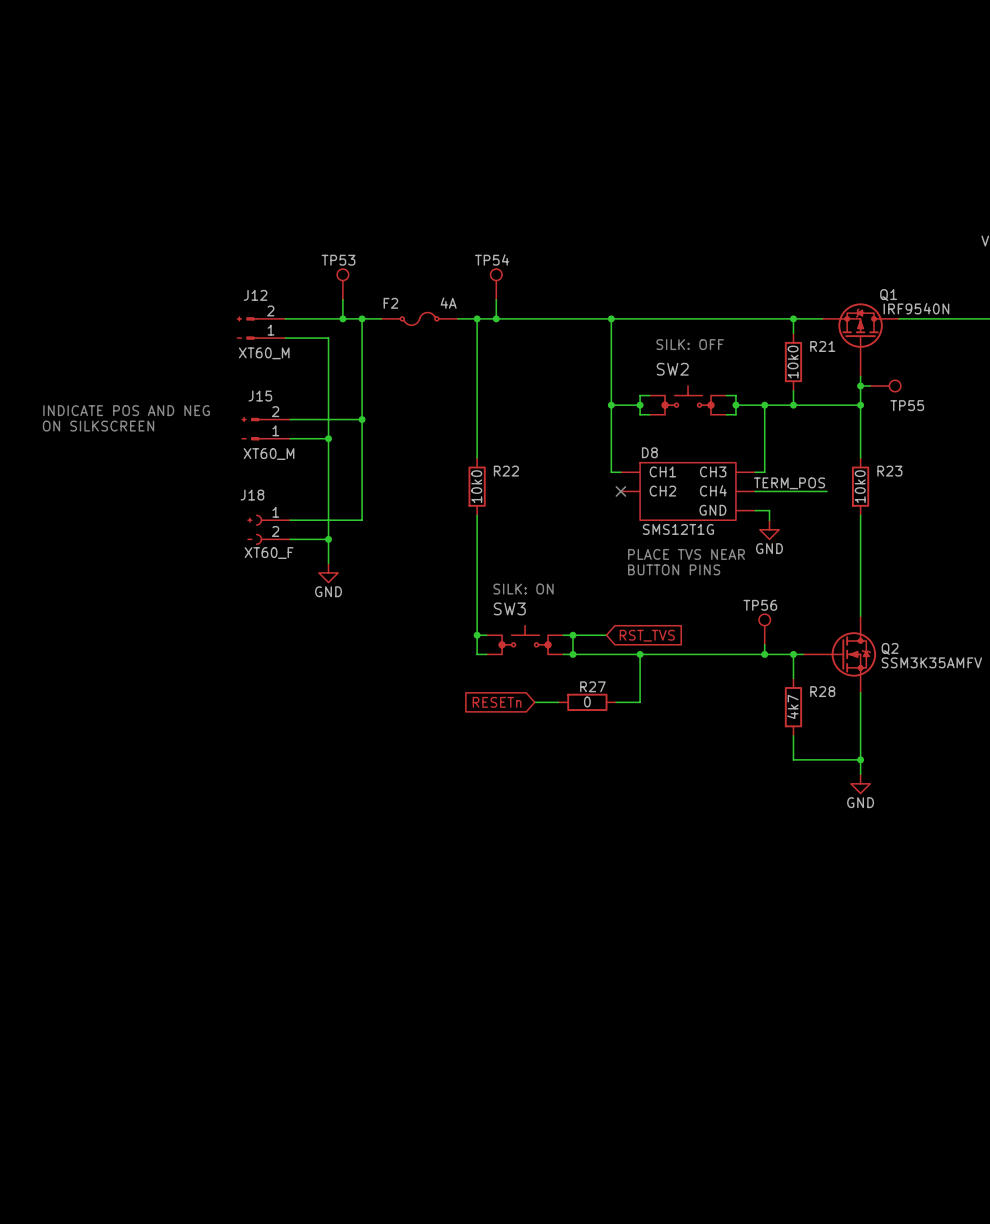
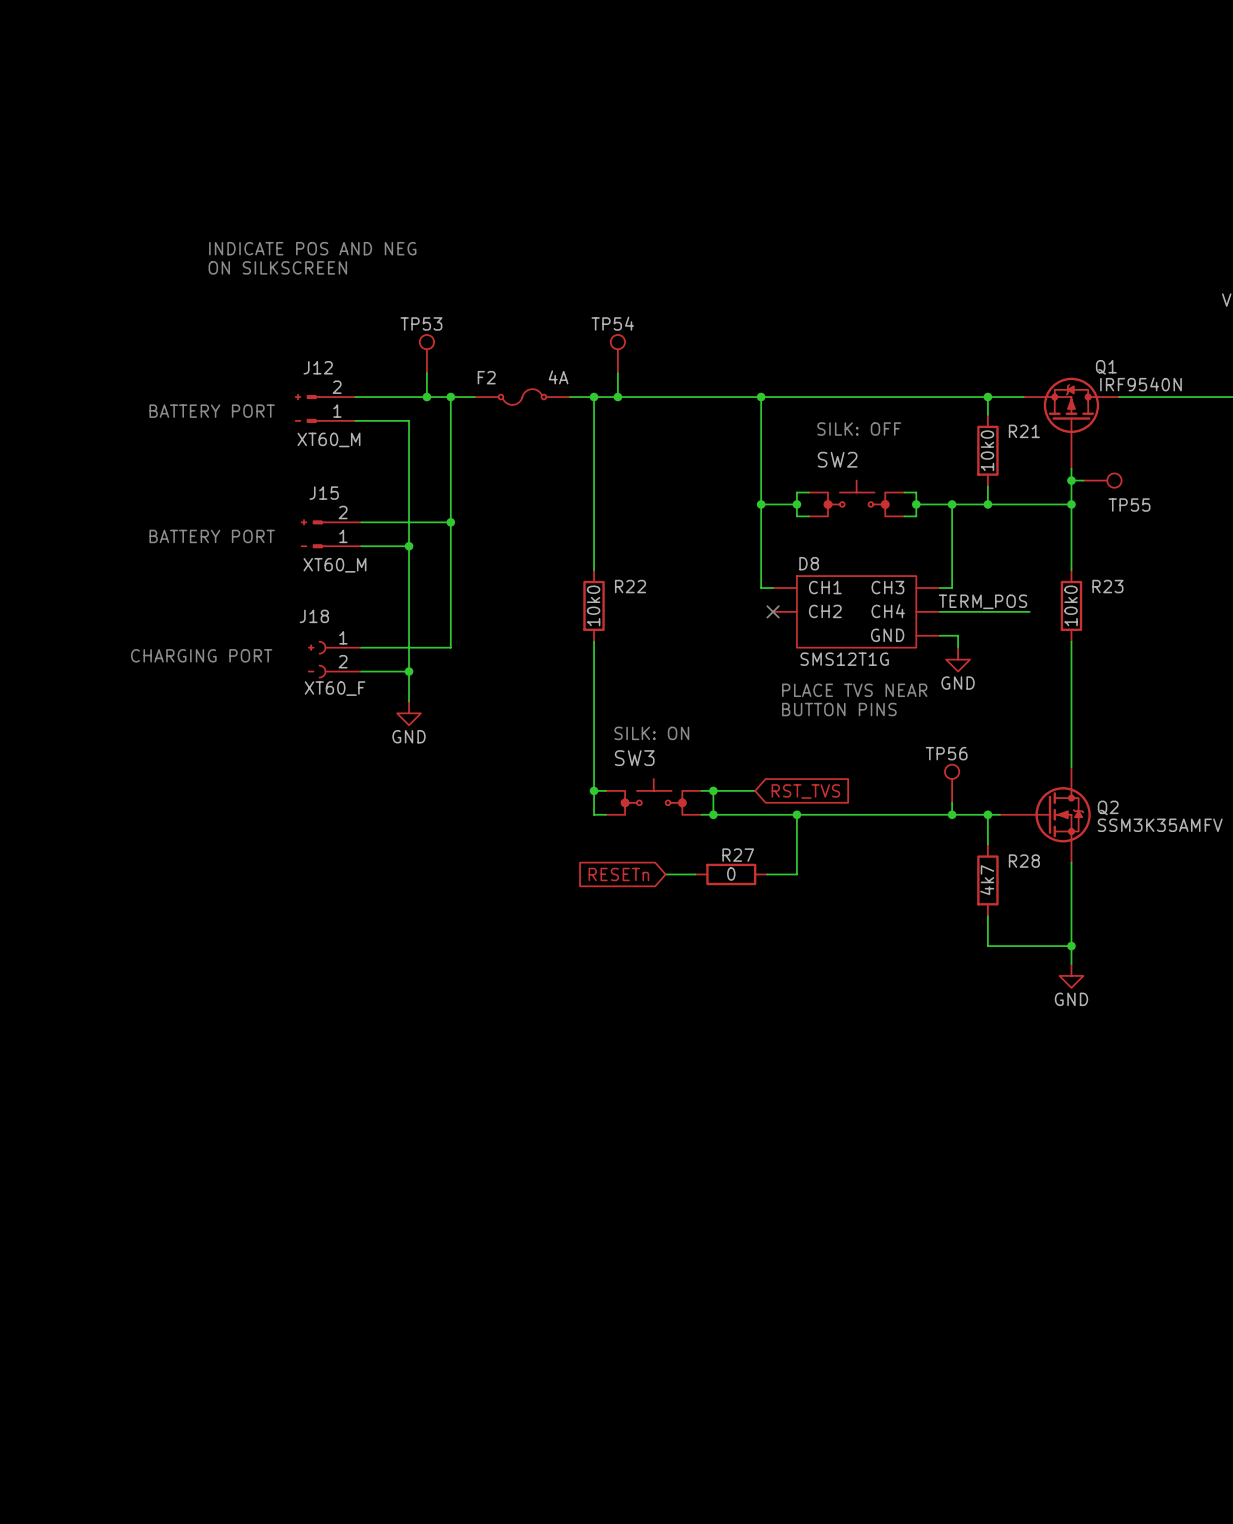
text: none -> INDICATE POS AND NEG (312, 248)
text: none -> ON SILKSCREEN (277, 267)
text: none -> BATTERY PORT (212, 411)
text: INDICATE POS AND NEG (126, 410) -> none
text: ON SILKSCREEN (98, 426) -> none
text: none -> BATTERY PORT (212, 536)
text: none -> CHARGING PORT (201, 655)

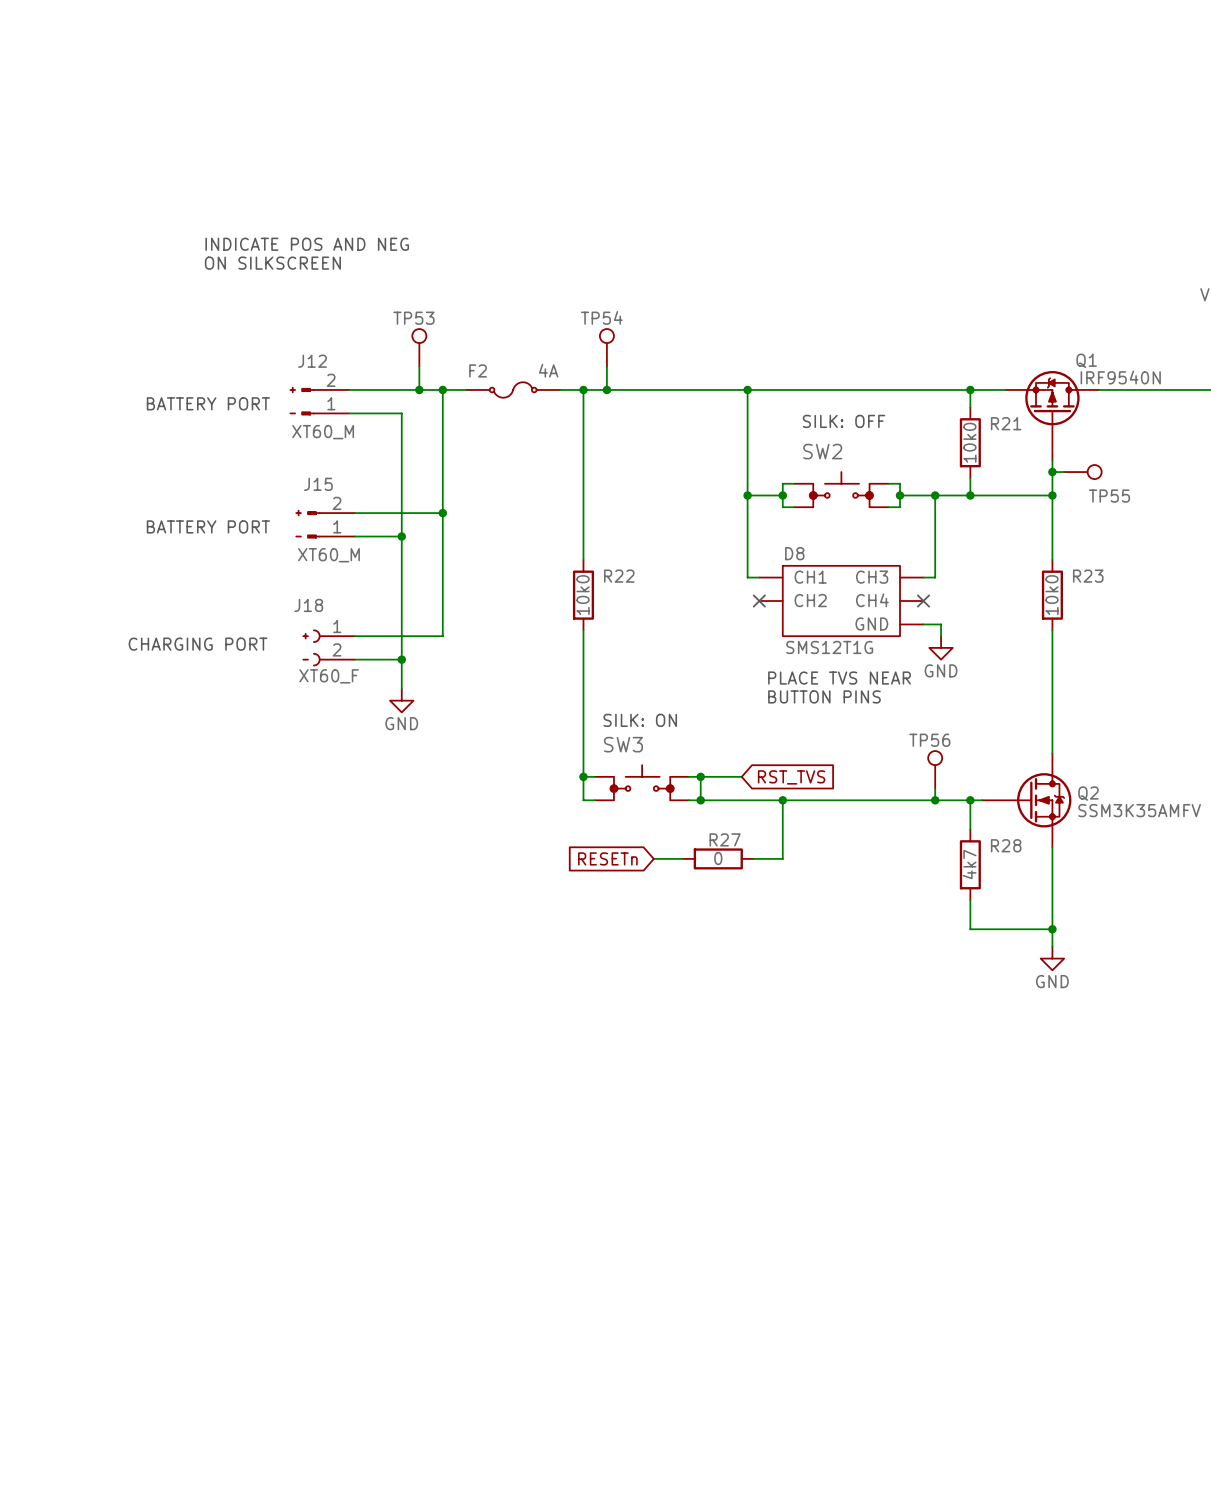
label: TERM_POS (982, 601) -> none
wire: (940, 611) (1029, 611) -> none
no-connect mark: none -> (923, 601)

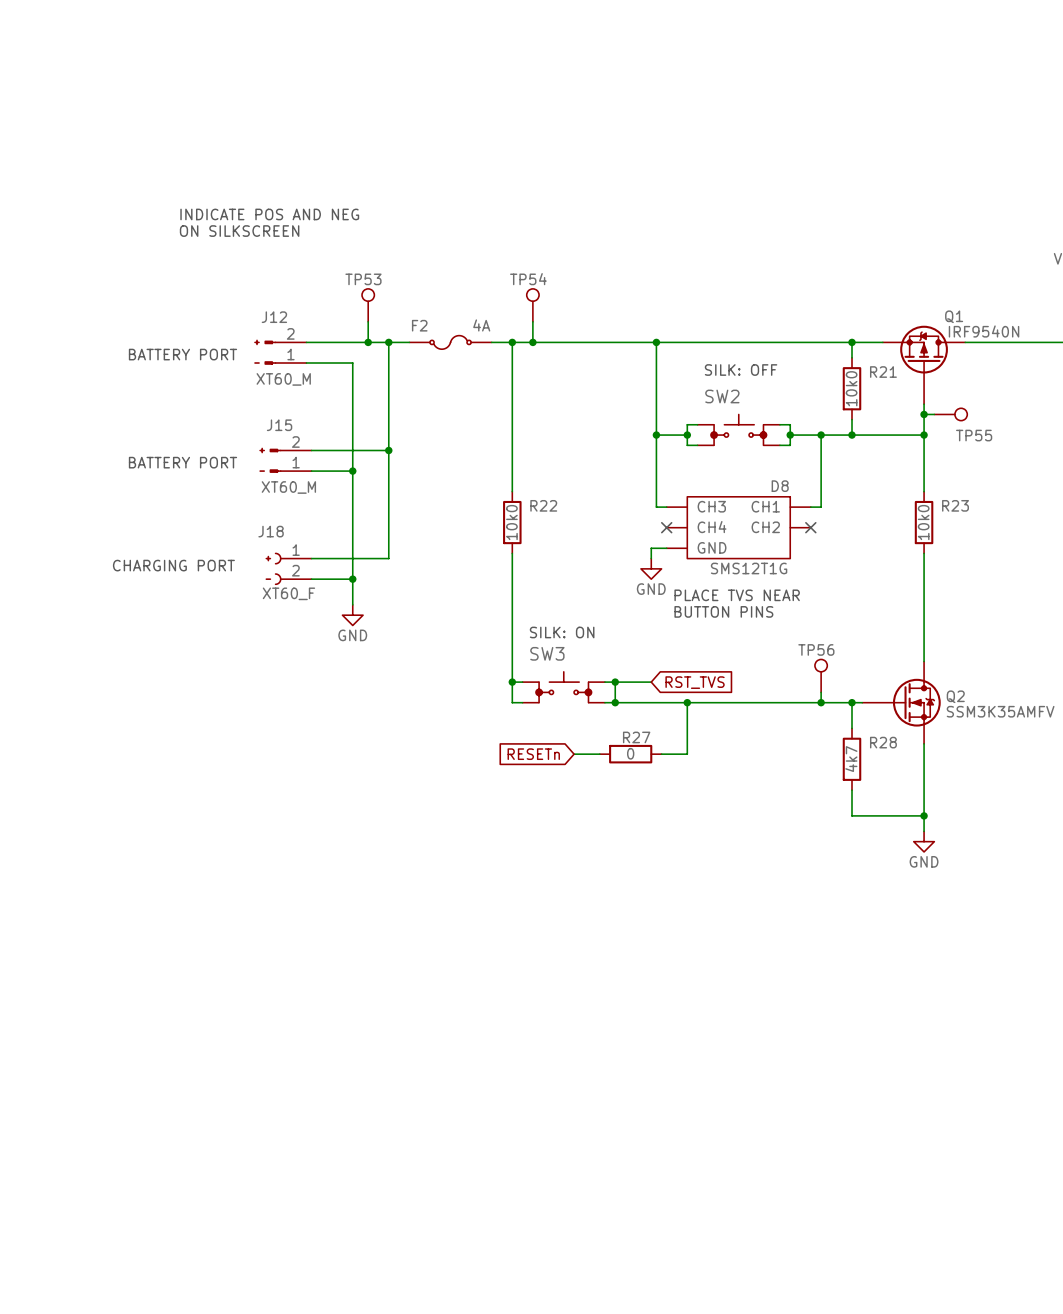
D8 flip: as is (841, 601) -> left-right (738, 527)
wire: none -> (666, 548) (651, 548) (651, 558)
wire: (923, 624) (941, 624) (941, 636) -> none
power symbol position: GND (941, 647) -> GND (651, 568)

